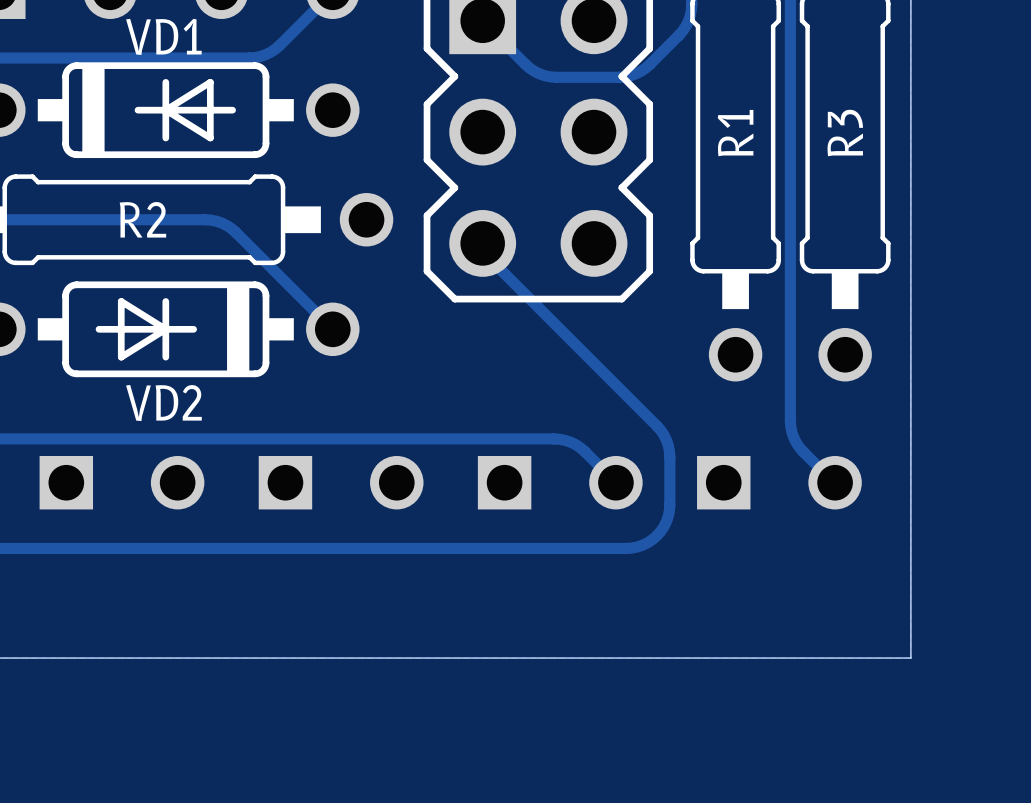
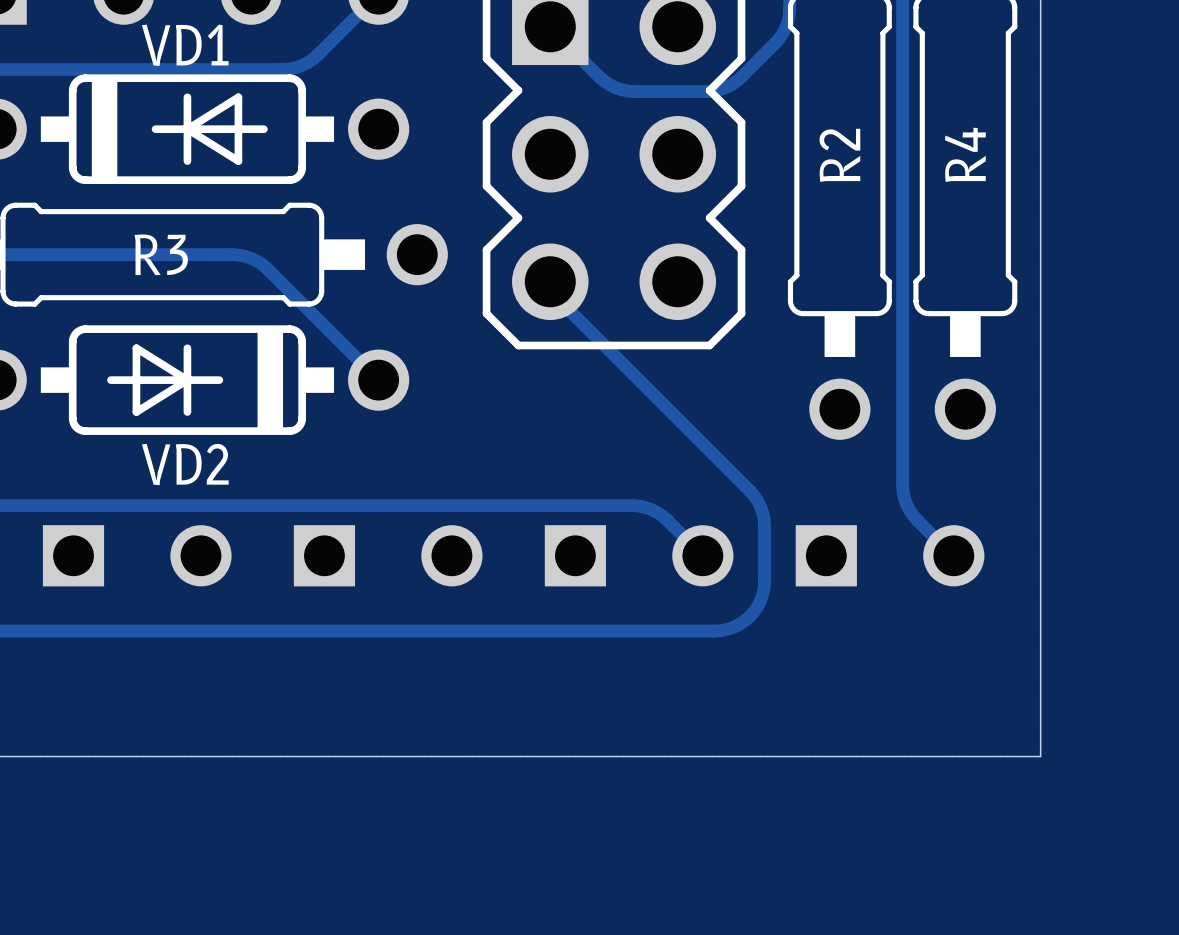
R1 name: R1 (735, 133) -> R2 (839, 155)
R3 name: R3 (845, 133) -> R4 (965, 154)
R2 name: R2 (142, 219) -> R3 (161, 254)

